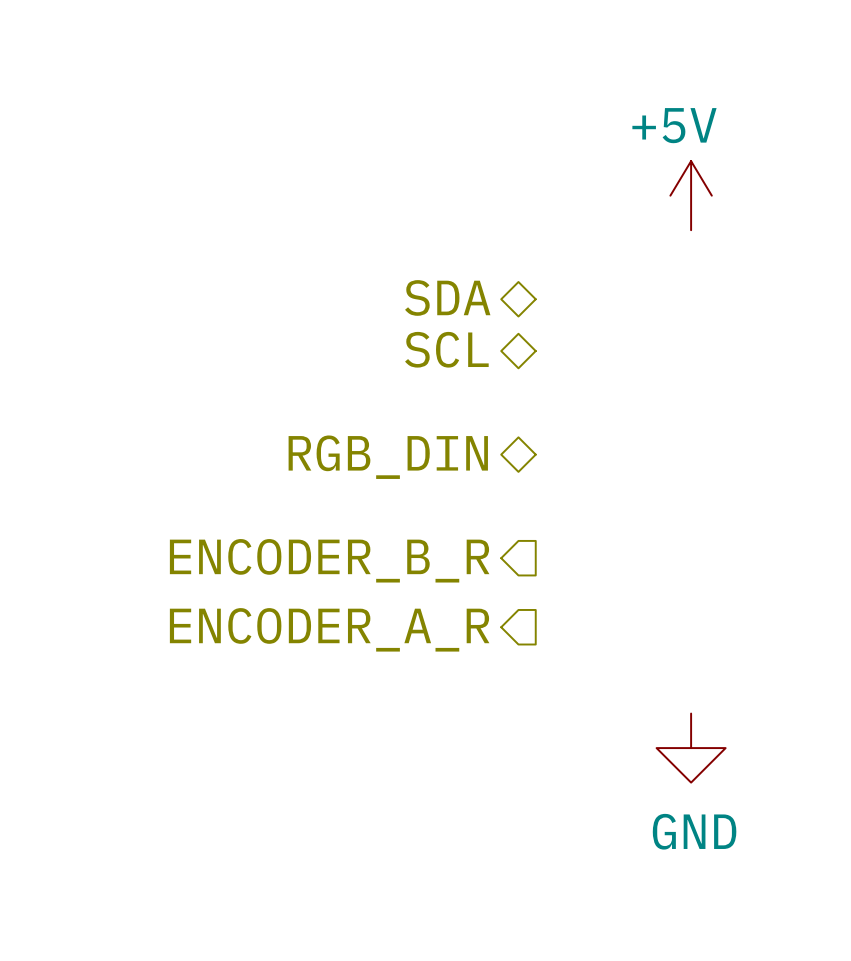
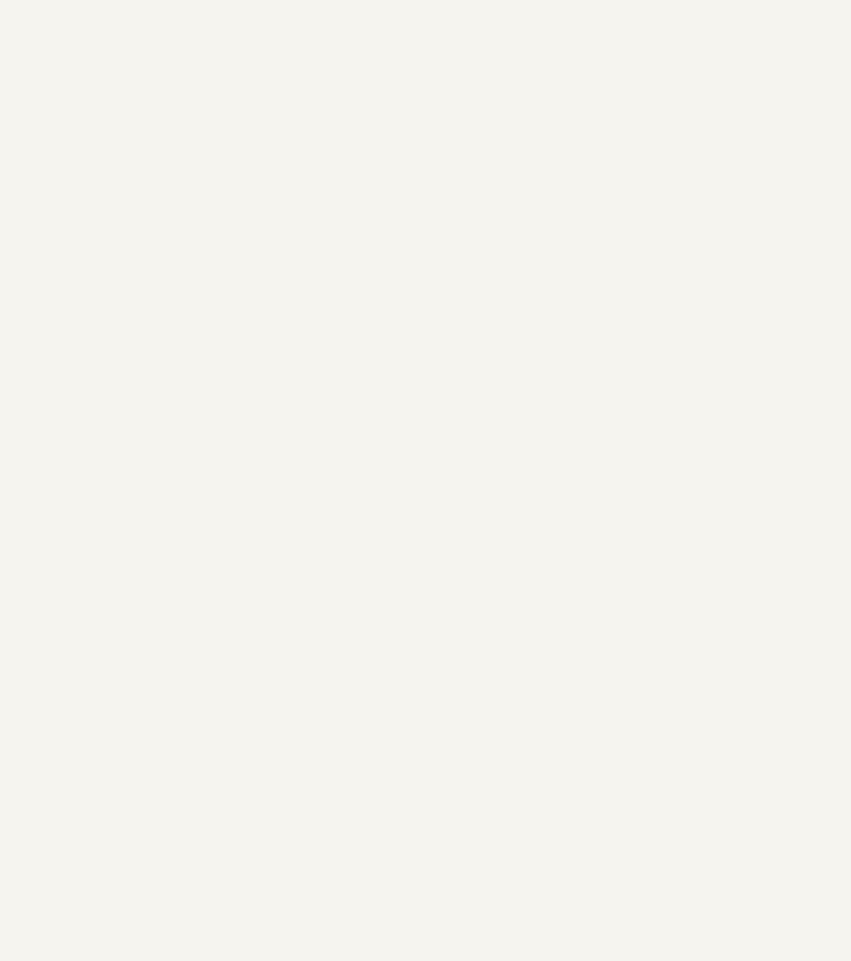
power symbol: +5V (691, 195) -> none
hierarchical label: SDA (447, 297) -> none
hierarchical label: SCL (446, 349) -> none
hierarchical label: RGB_DIN (388, 457) -> none
hierarchical label: ENCODER_B_R (329, 560) -> none
hierarchical label: ENCODER_A_R (329, 629) -> none
power symbol: GND (691, 748) -> none

